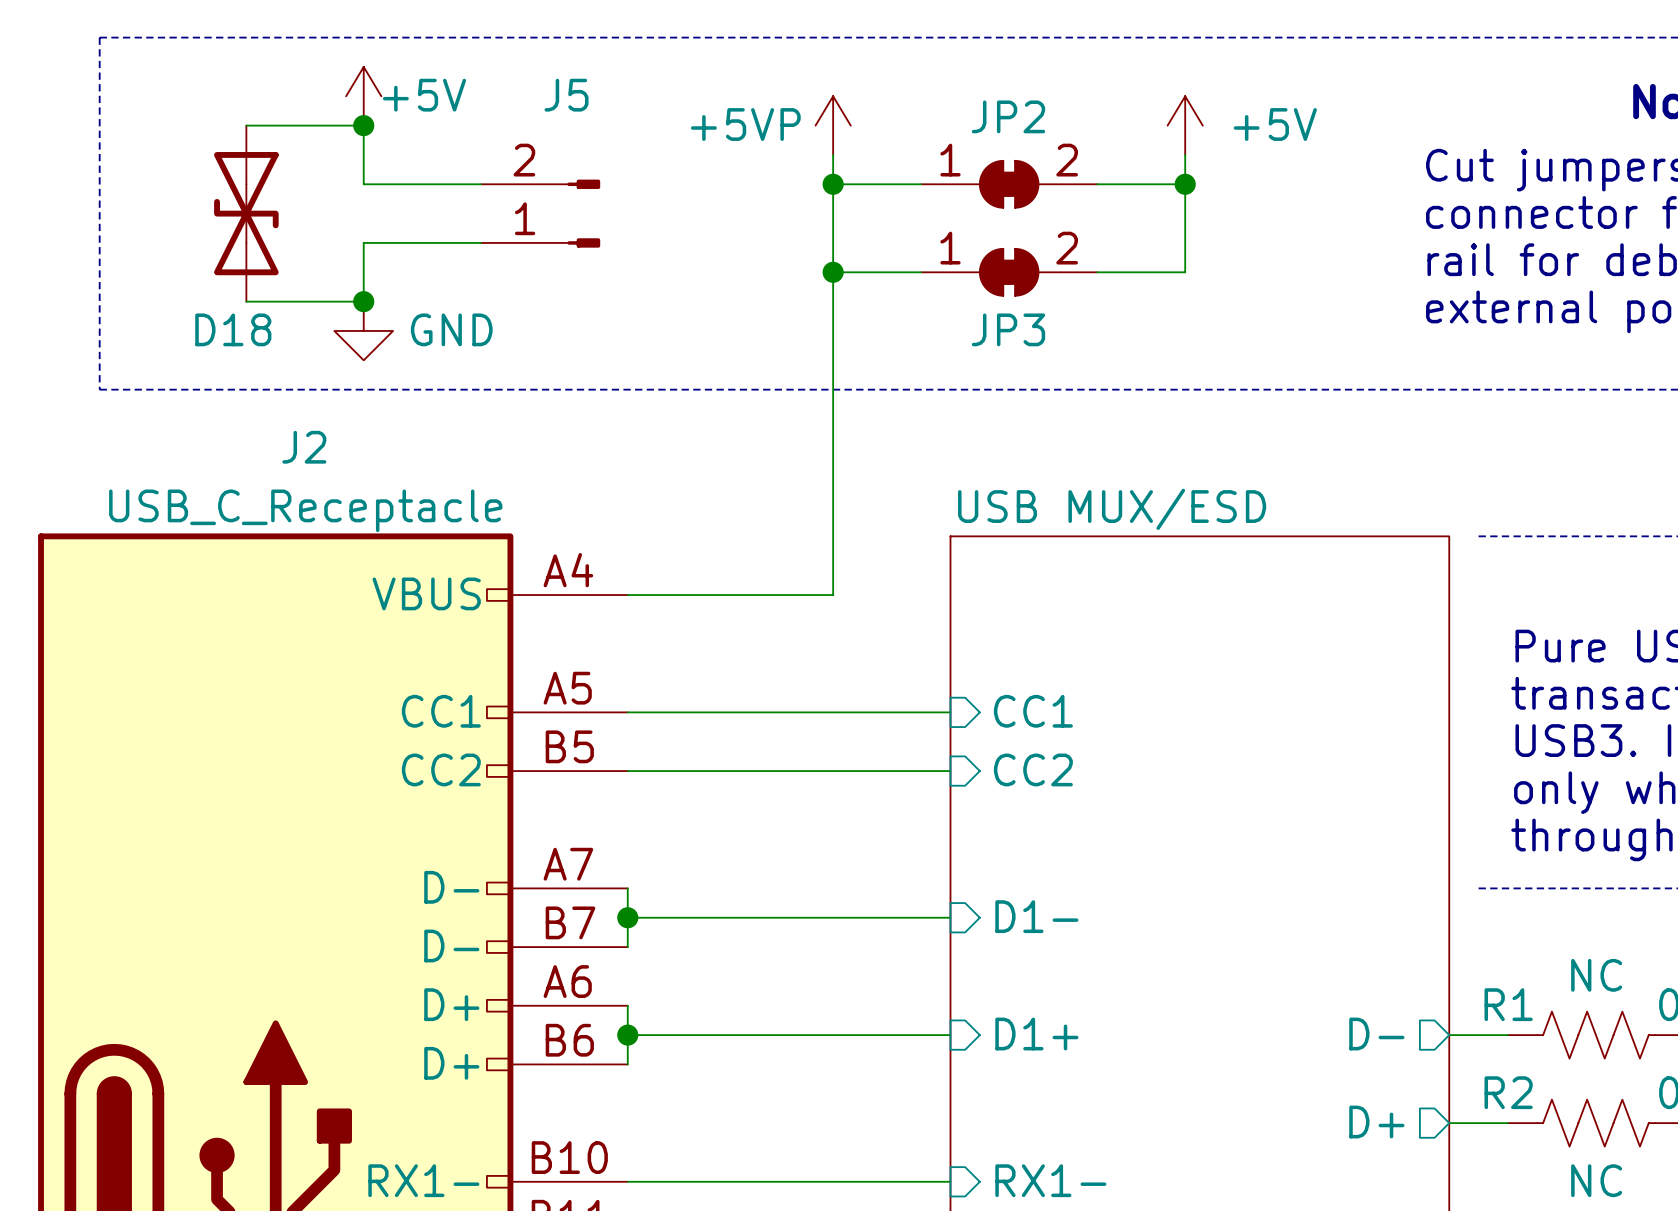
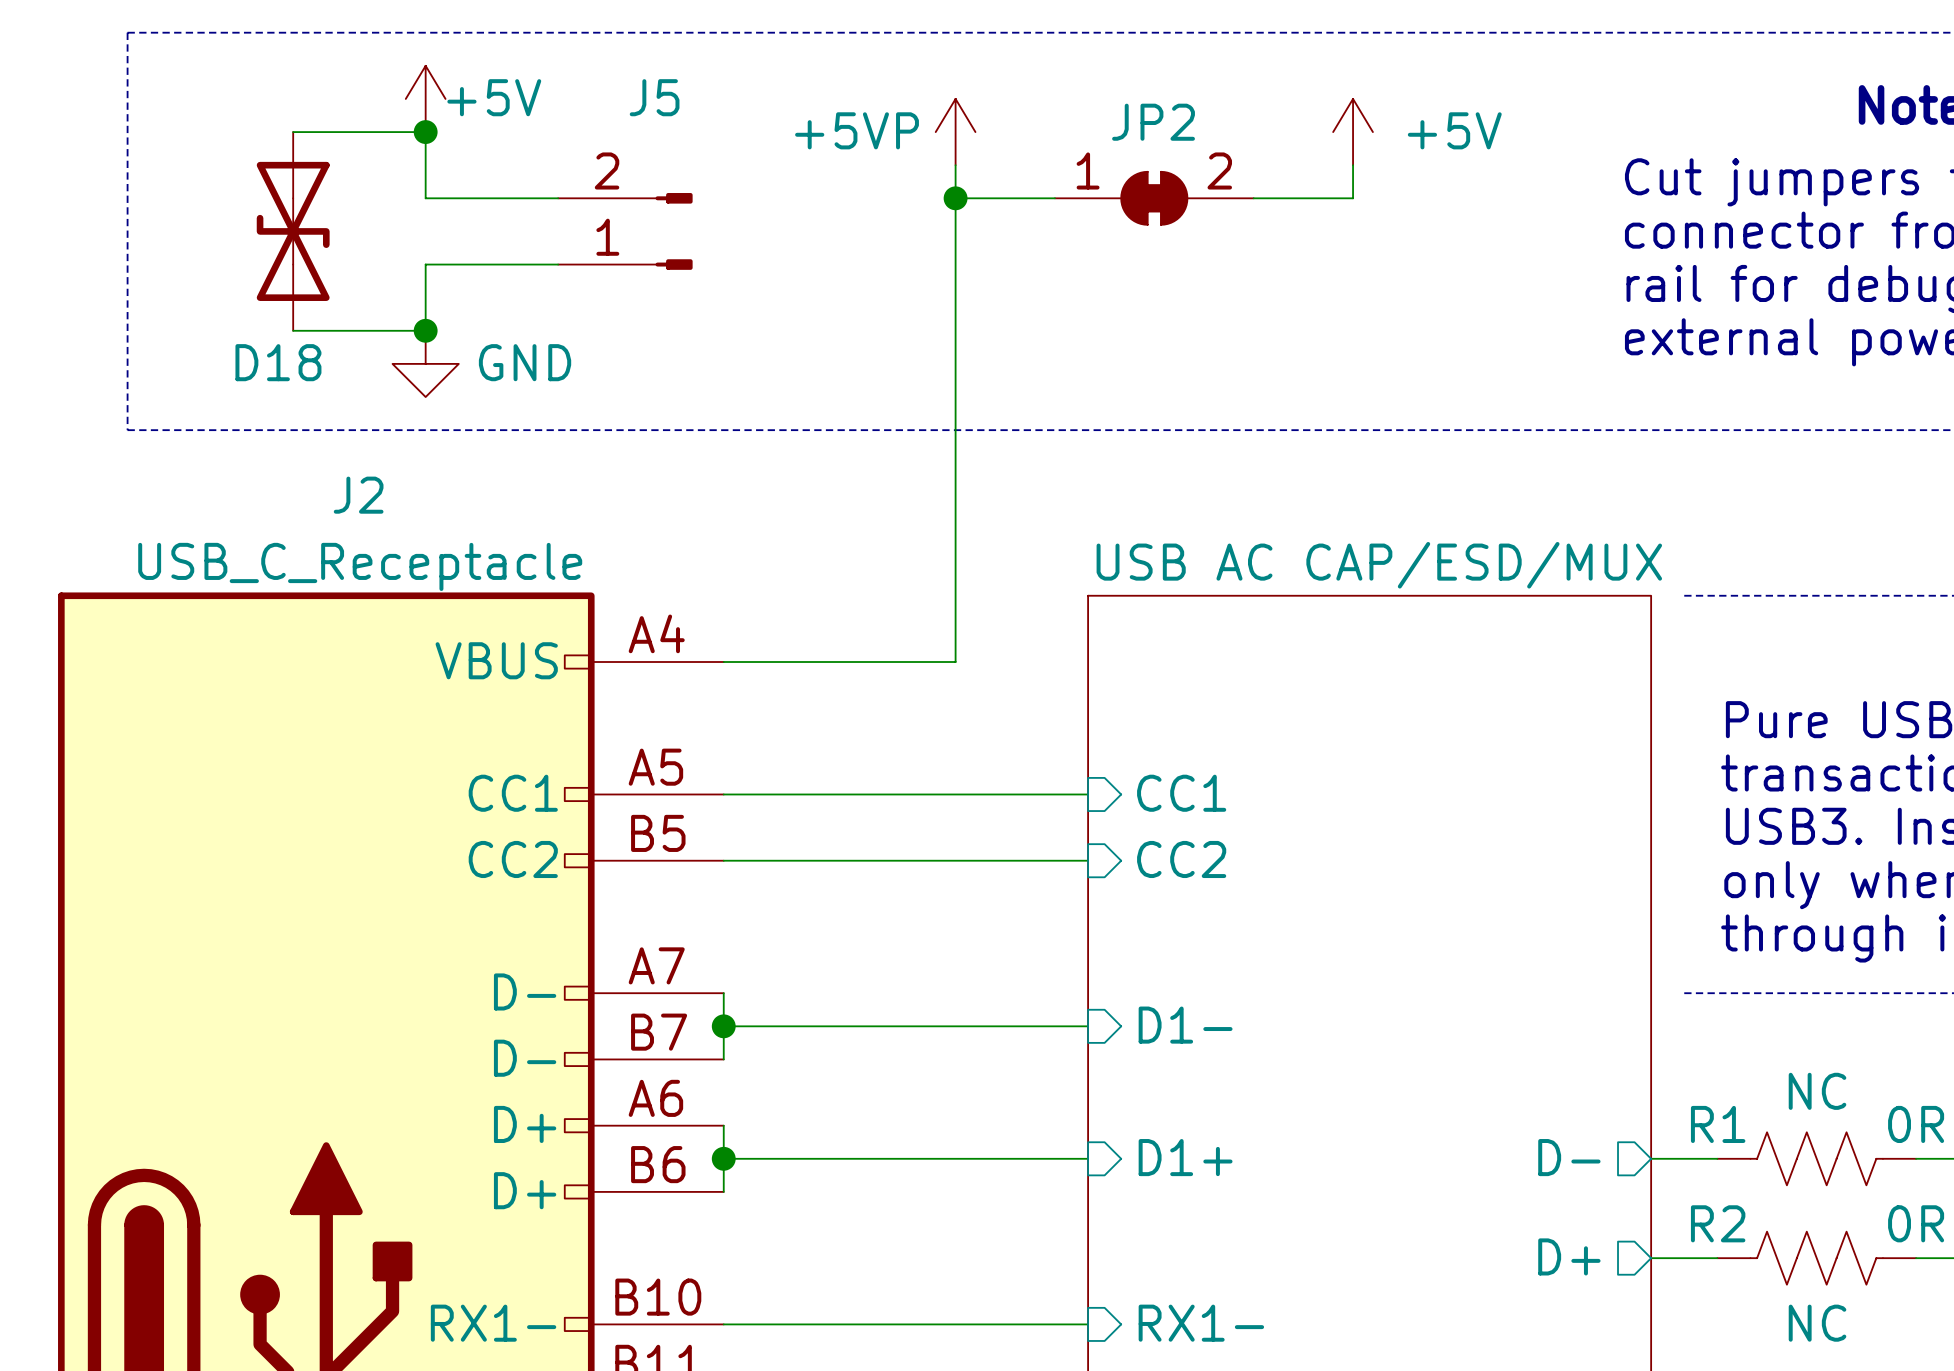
wire: (1185, 184) (1185, 272) (1097, 272) -> none
junction: (1185, 184) -> none
wire: (833, 272) (921, 272) -> none
junction: (833, 272) -> none
JP3: (1009, 272) -> none
sheet USB MUX/ESD name: USB MUX/ESD (1112, 509) -> USB AC CAP/ESD/MUX (1379, 565)

